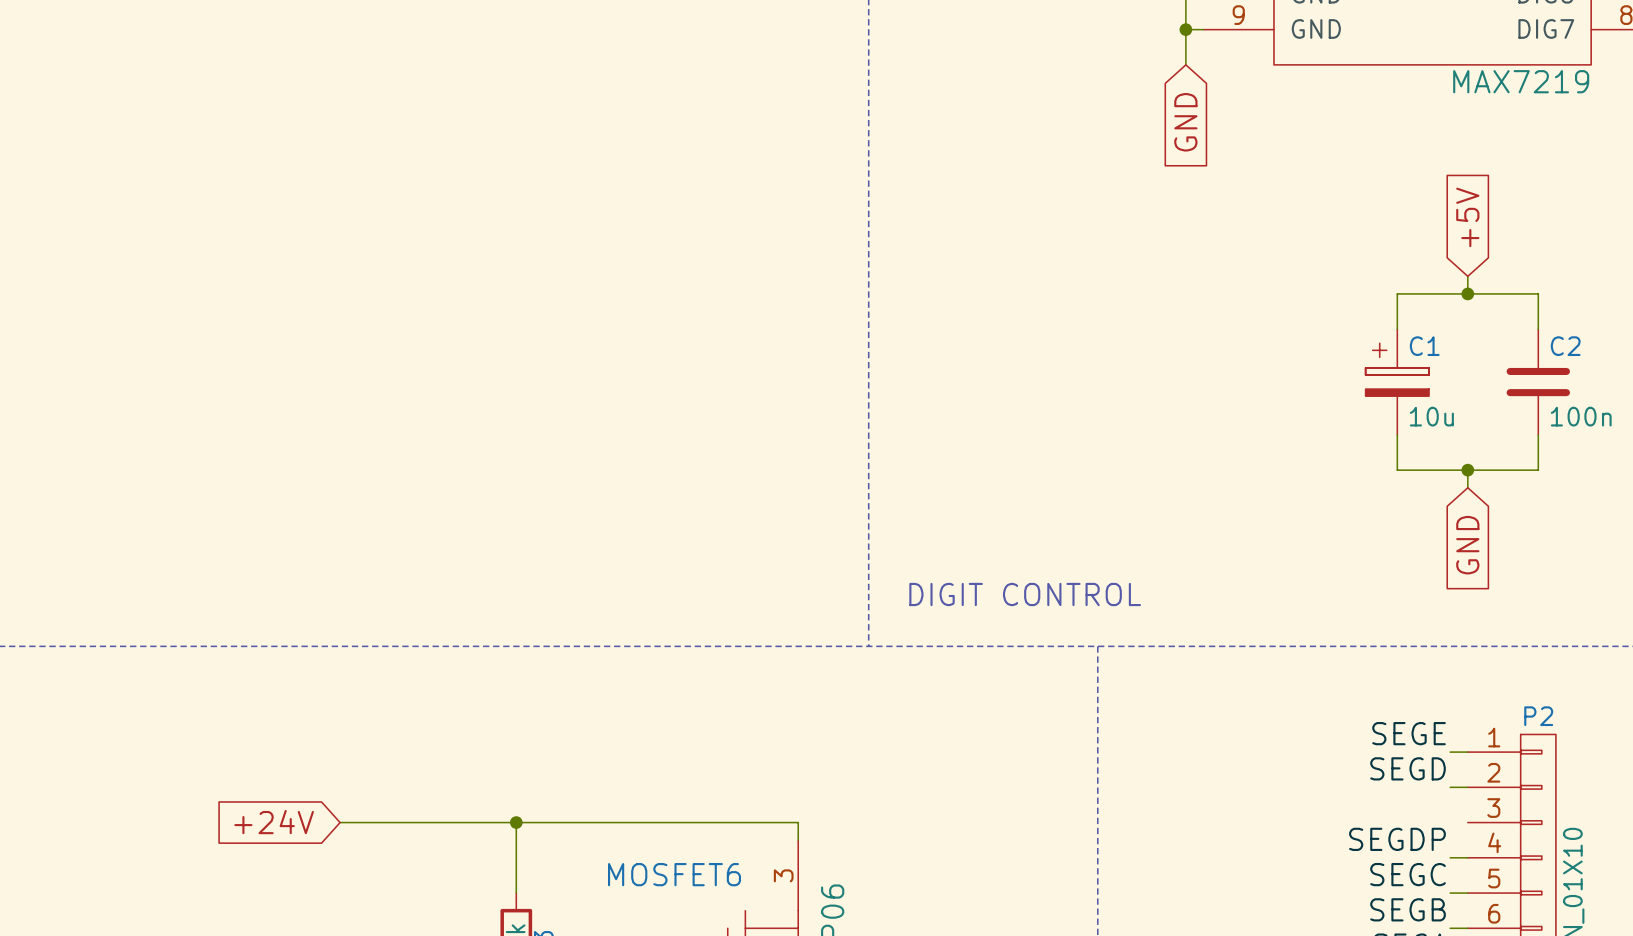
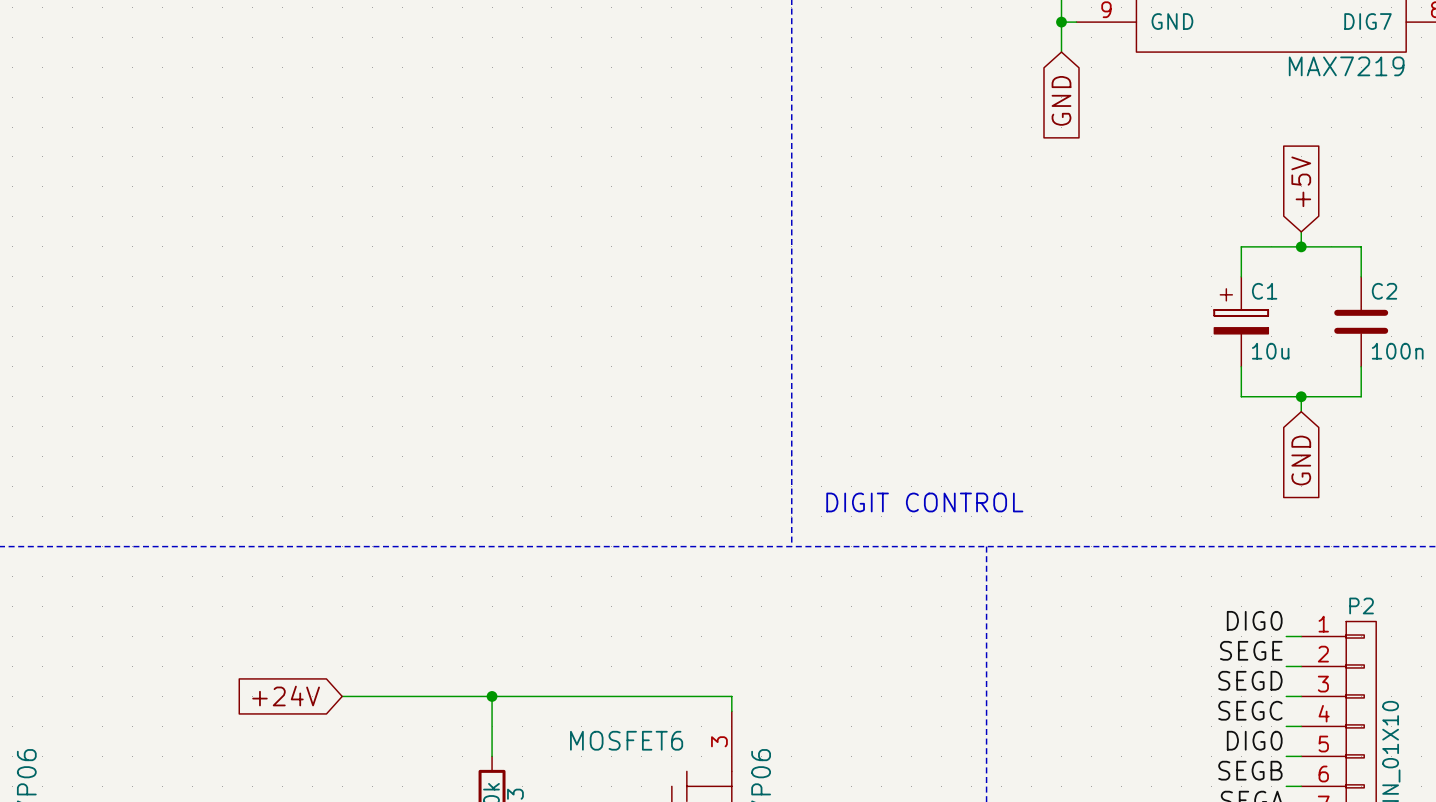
label: SEGE (1409, 733) -> DIG0 (1254, 620)
label: SEGD (1408, 768) -> SEGE (1251, 650)
label: none -> SEGD (1250, 680)
wire: none -> (1286, 696) (1301, 696)
label: SEGDP (1397, 839) -> SEGC (1250, 710)
label: SEGC (1408, 874) -> DIG0 (1254, 740)

